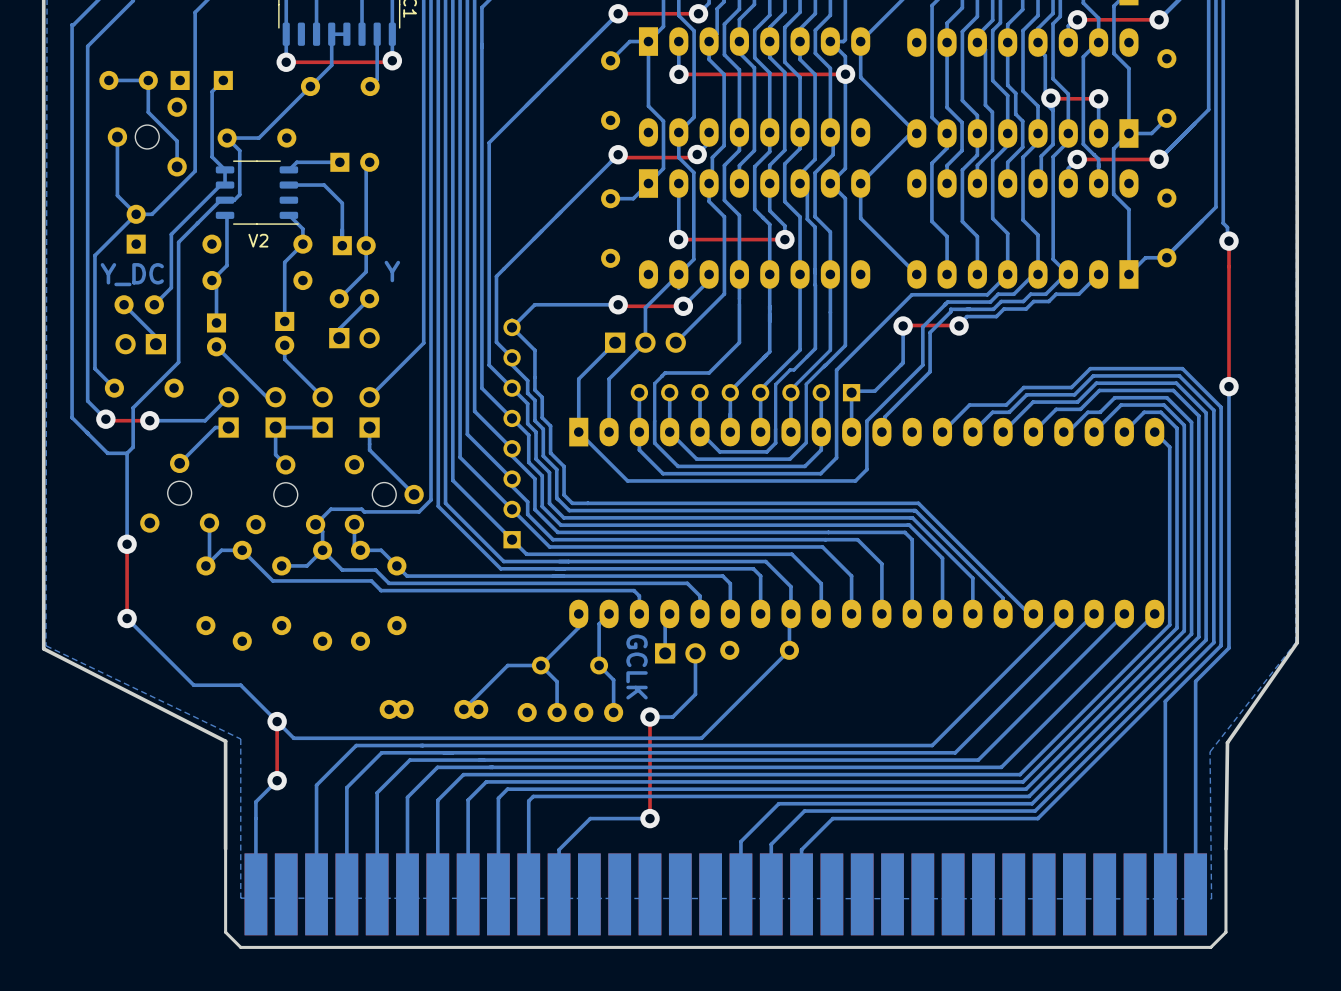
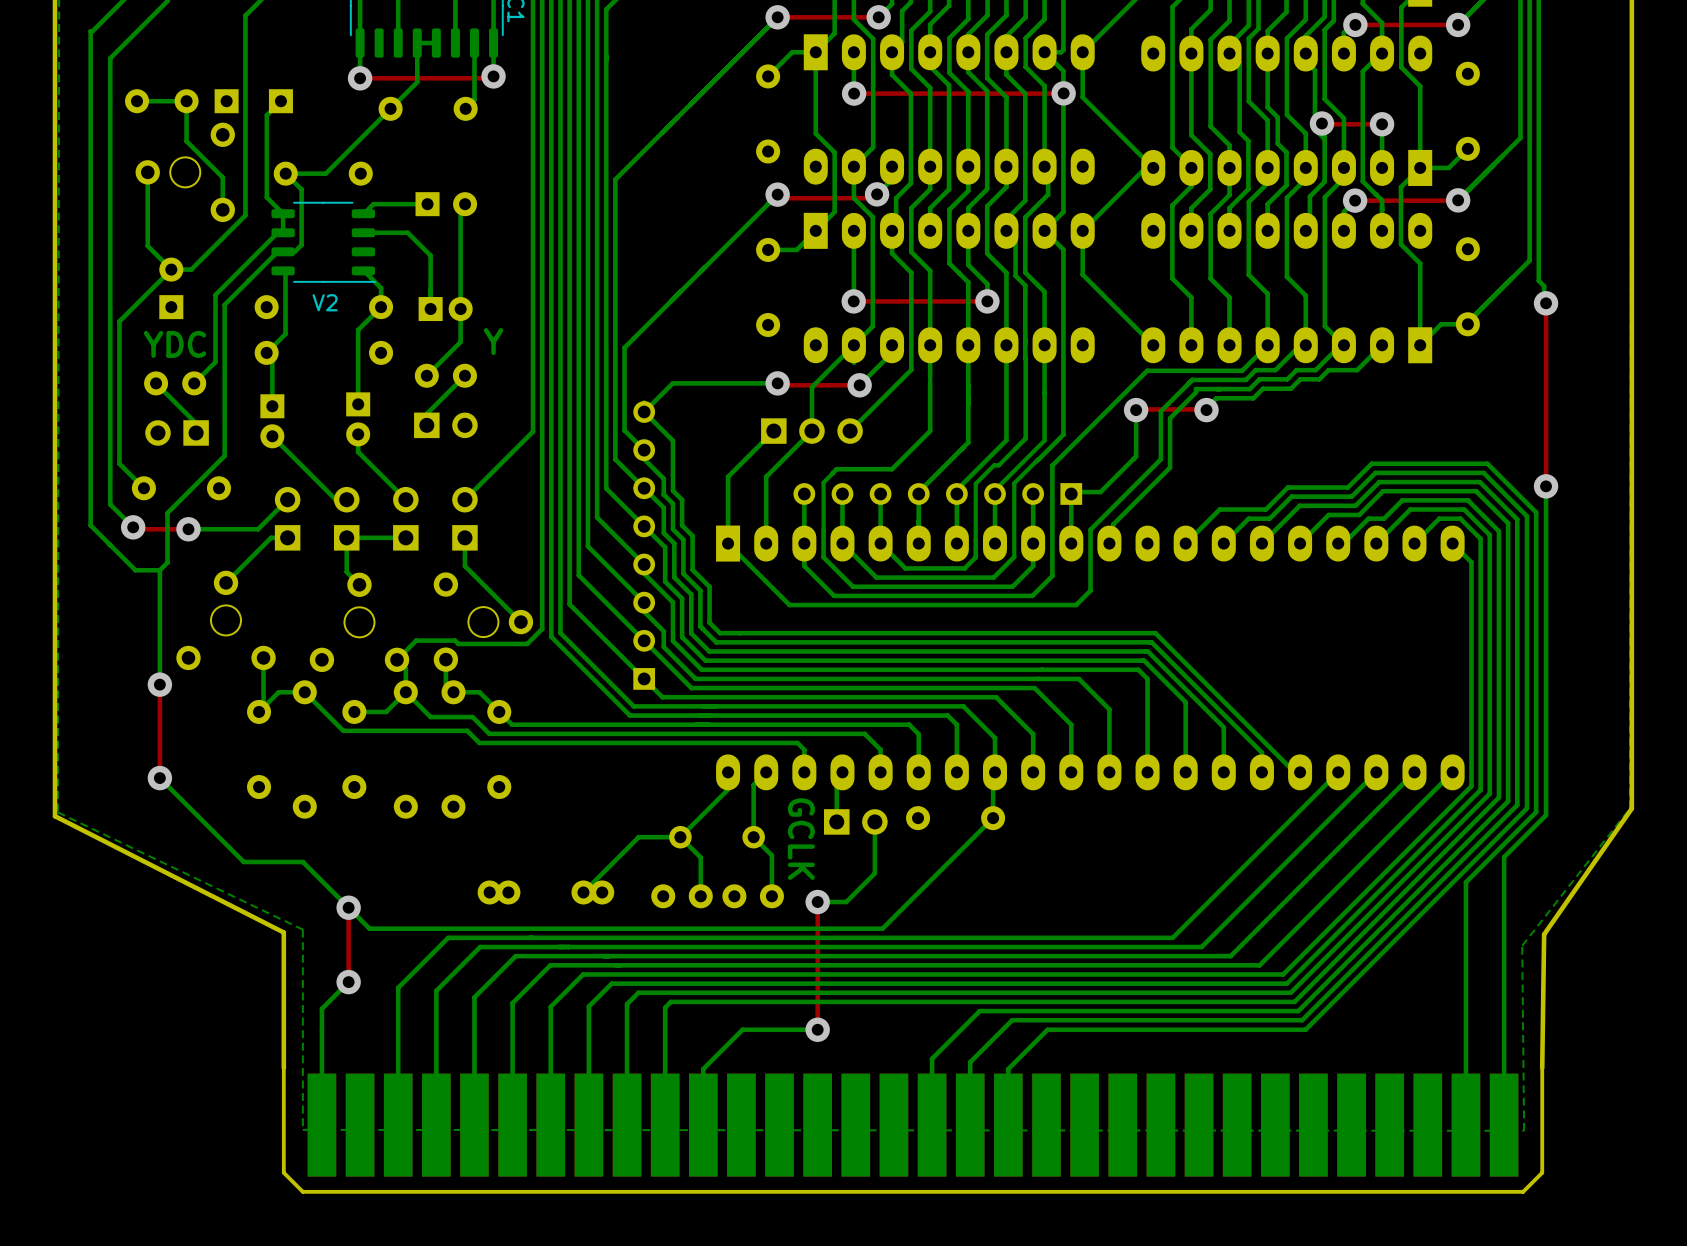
text: Y_DC (132, 274) -> YDC (175, 344)

